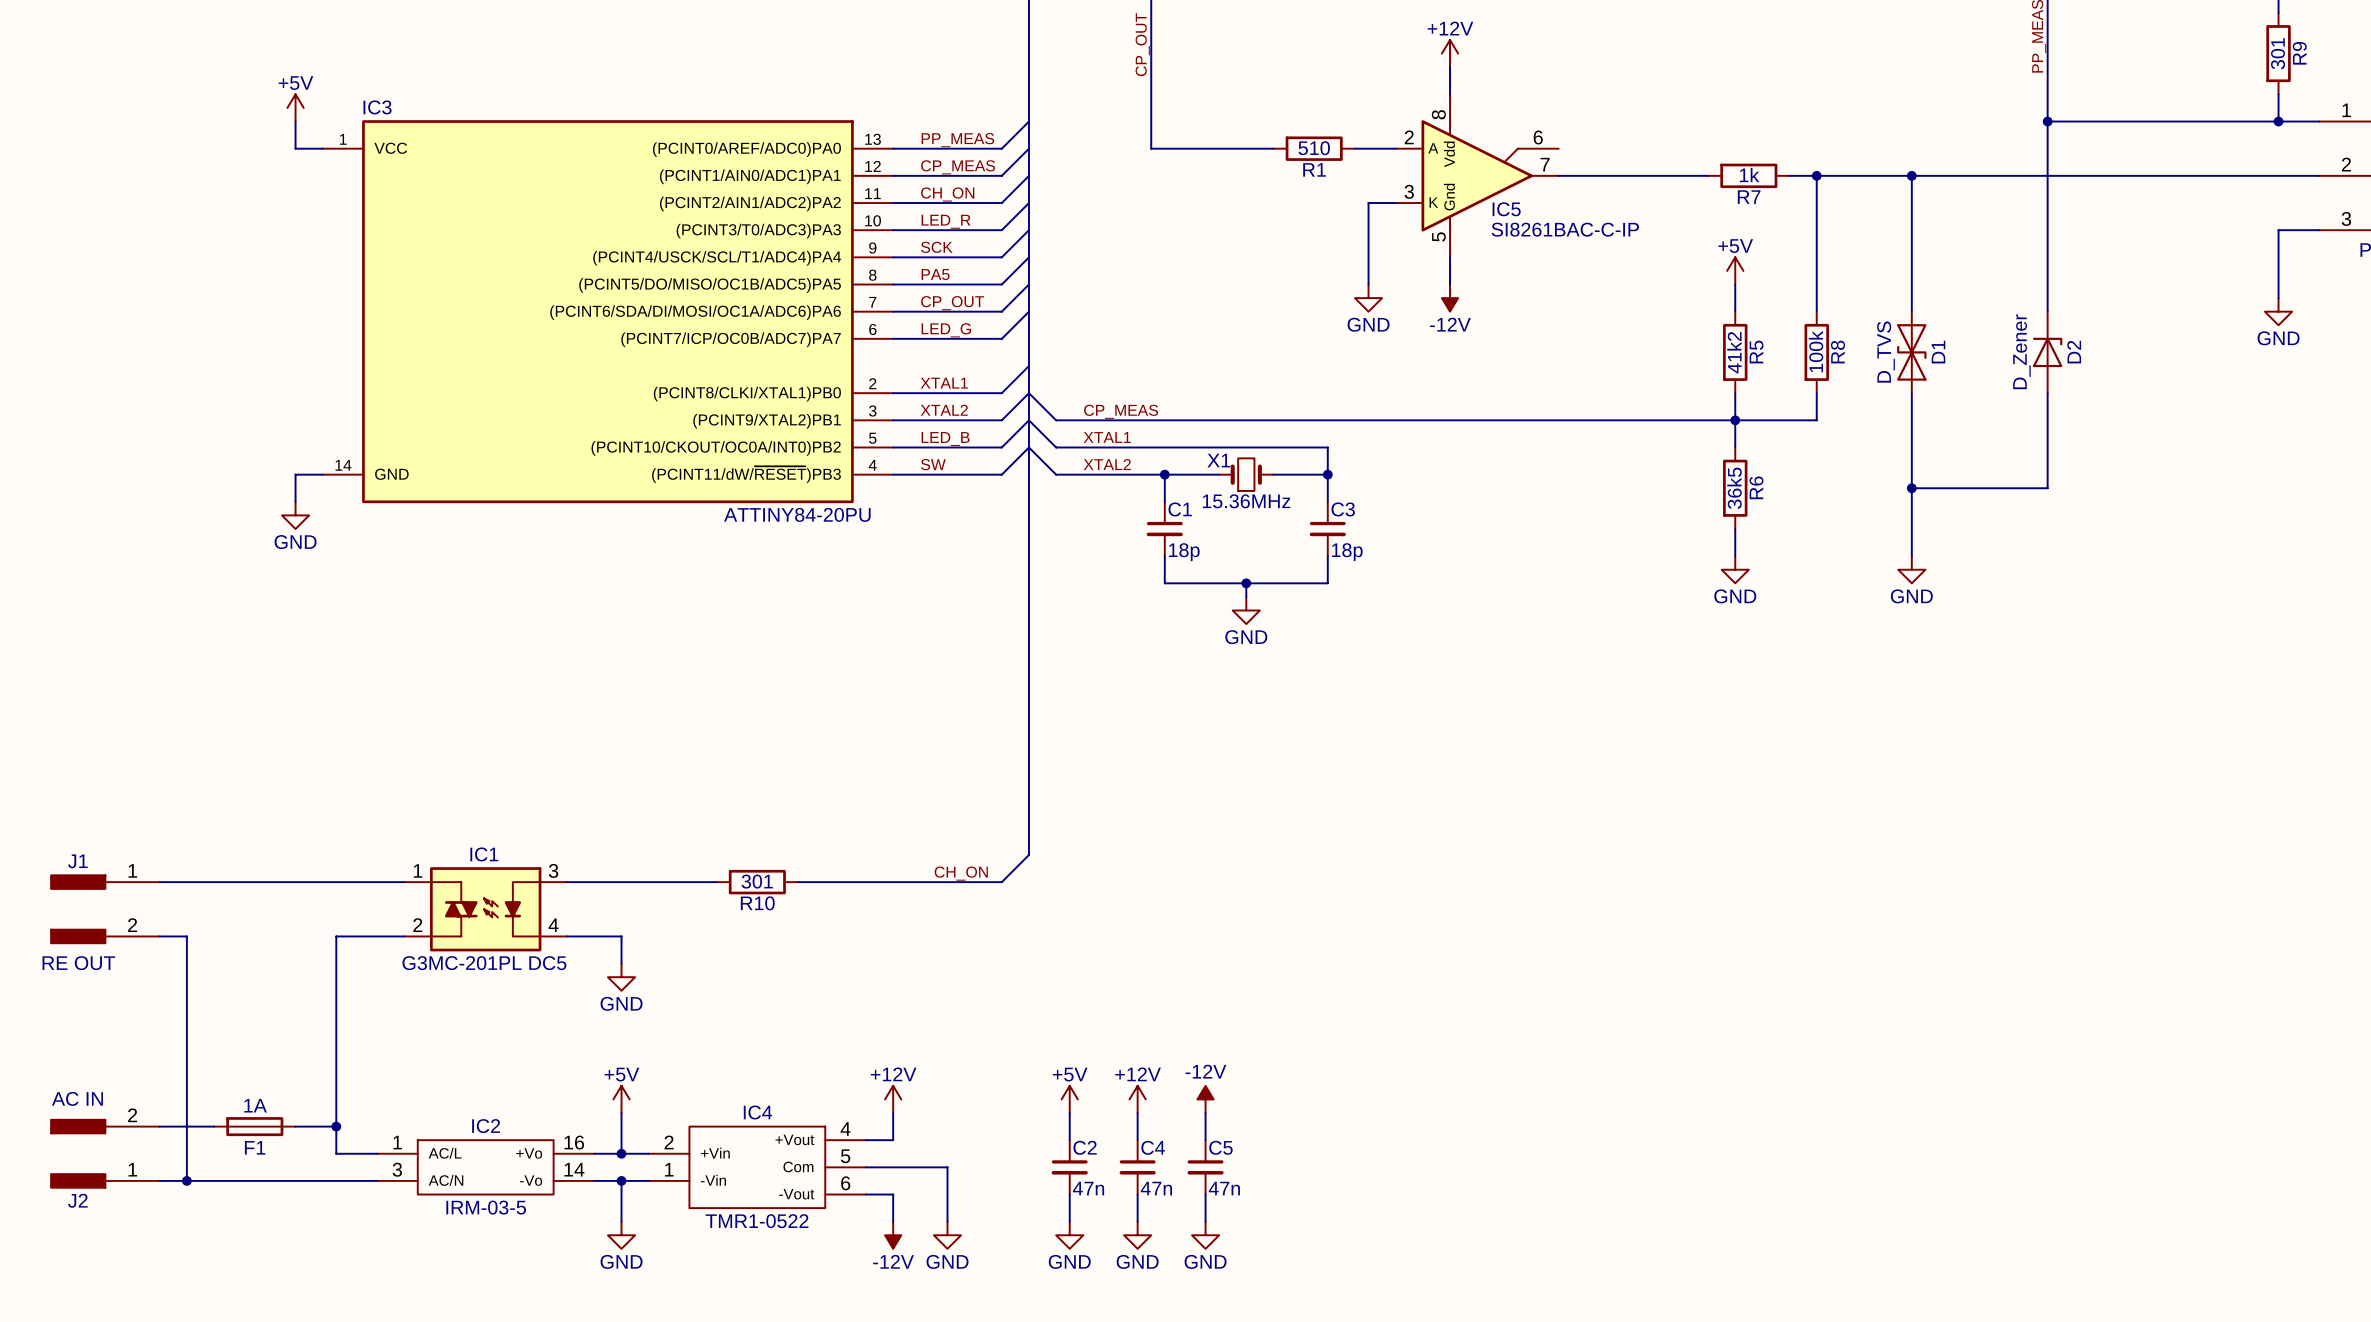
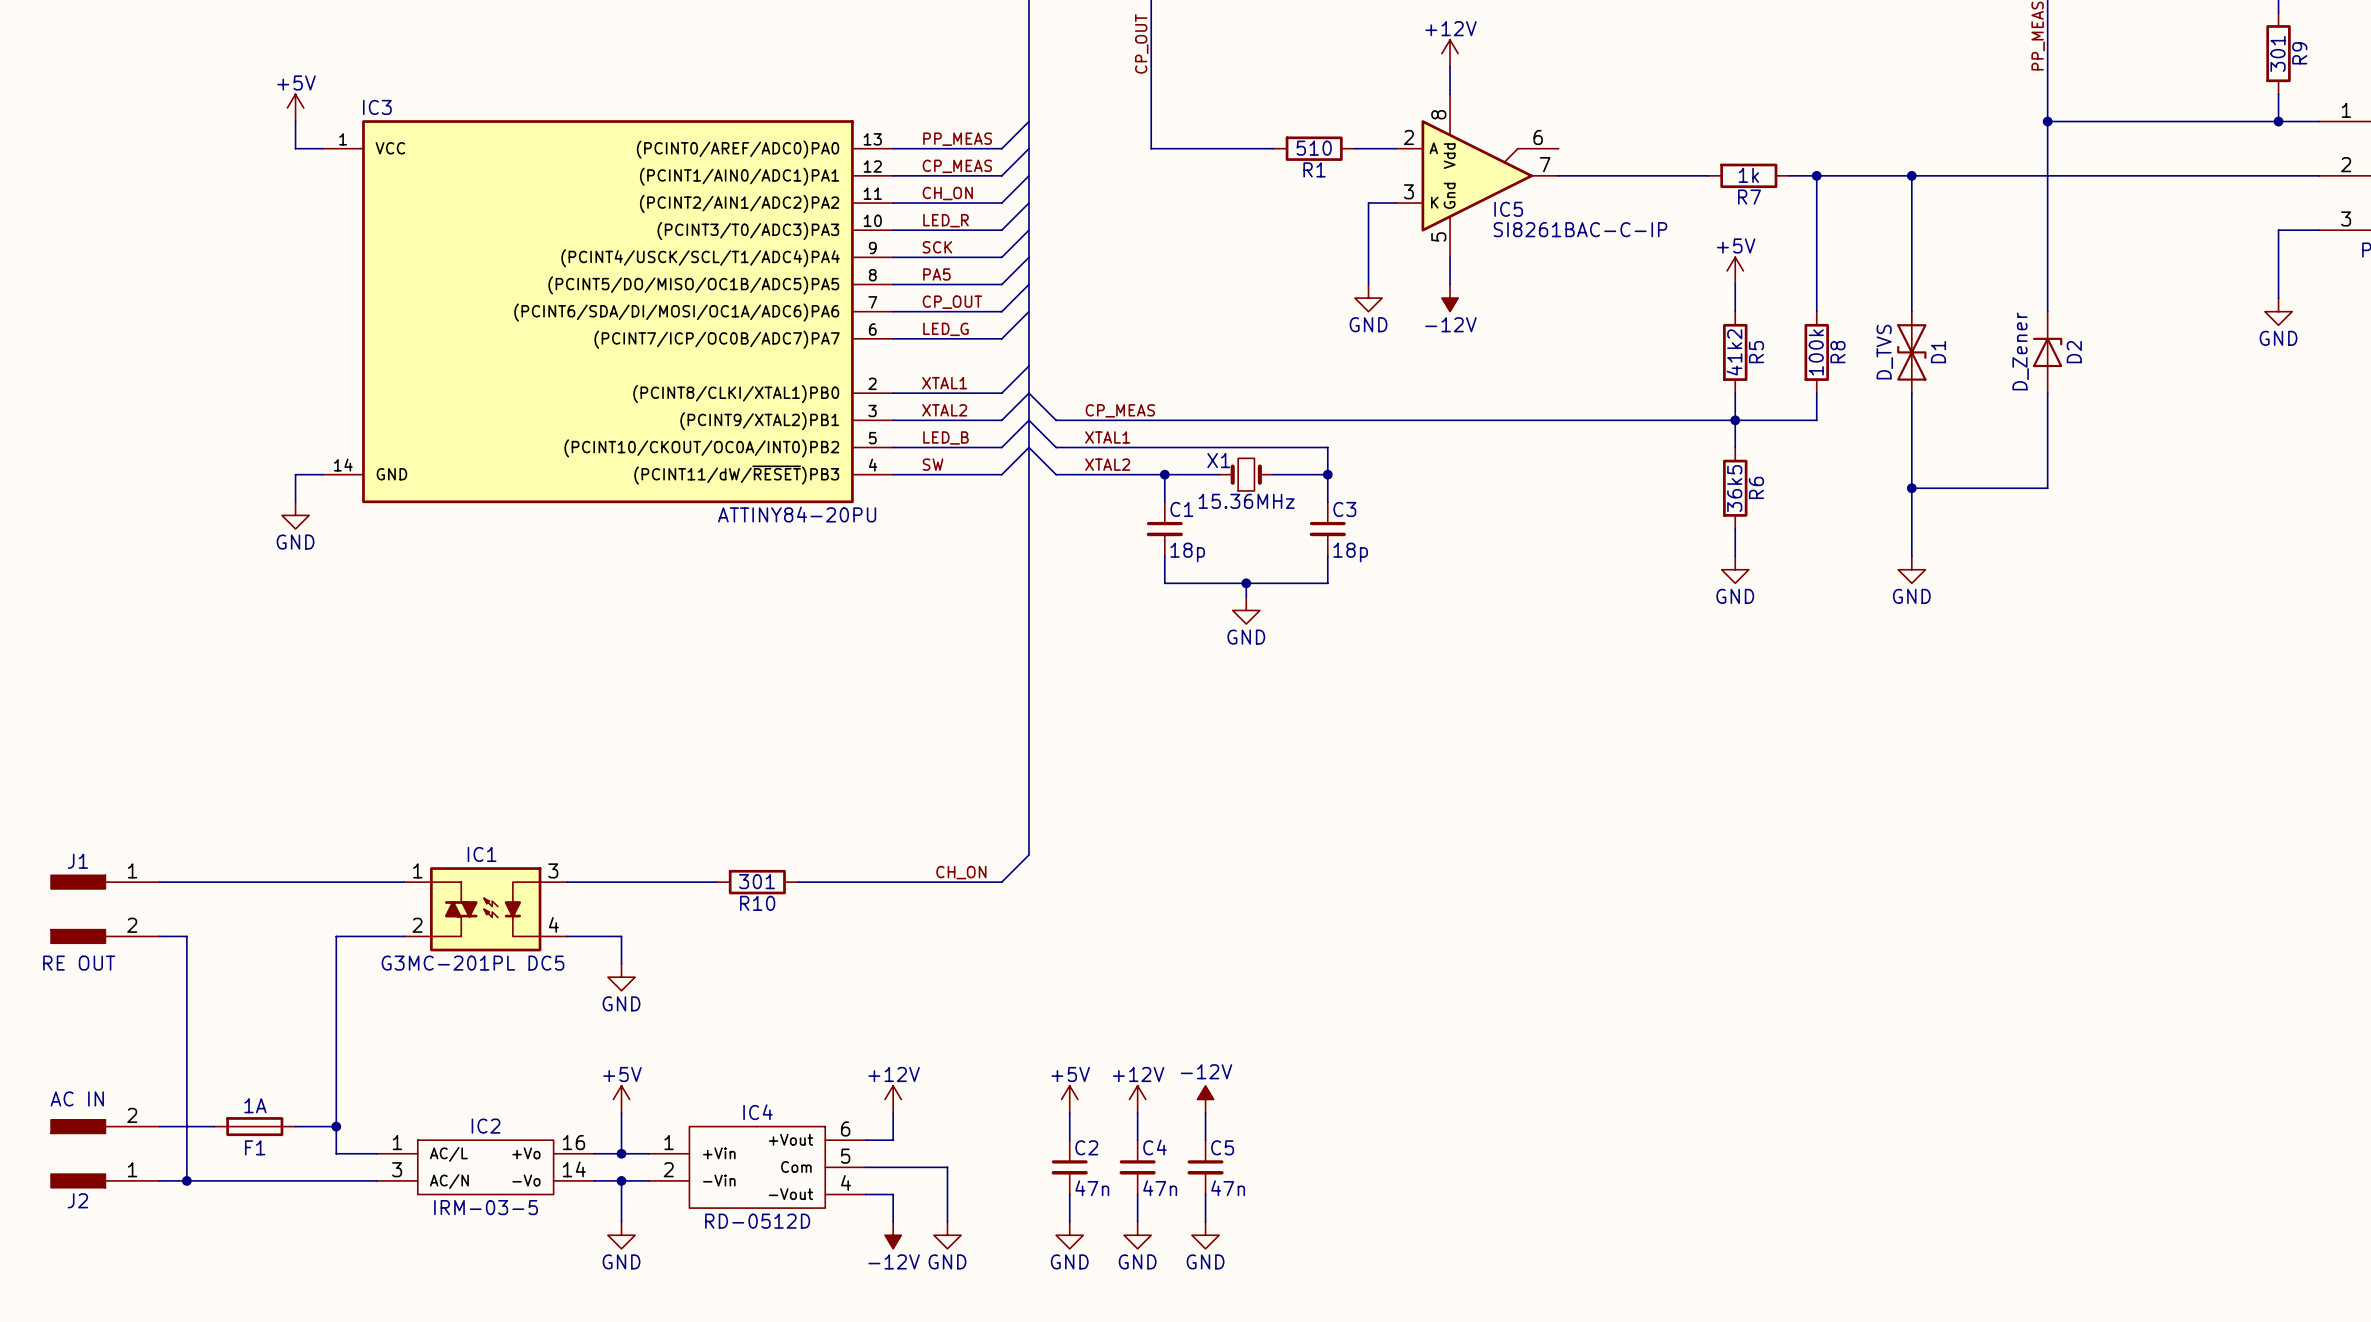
IC4 pin number: 4 (845, 1128) -> 6 (845, 1128)
IC4 pin number: 2 (669, 1142) -> 1 (669, 1142)
IC4 pin number: 1 (669, 1169) -> 2 (668, 1169)
IC4 pin number: 6 (845, 1183) -> 4 (845, 1182)
IC4 value: TMR1-0522 (757, 1221) -> RD-0512D (757, 1221)

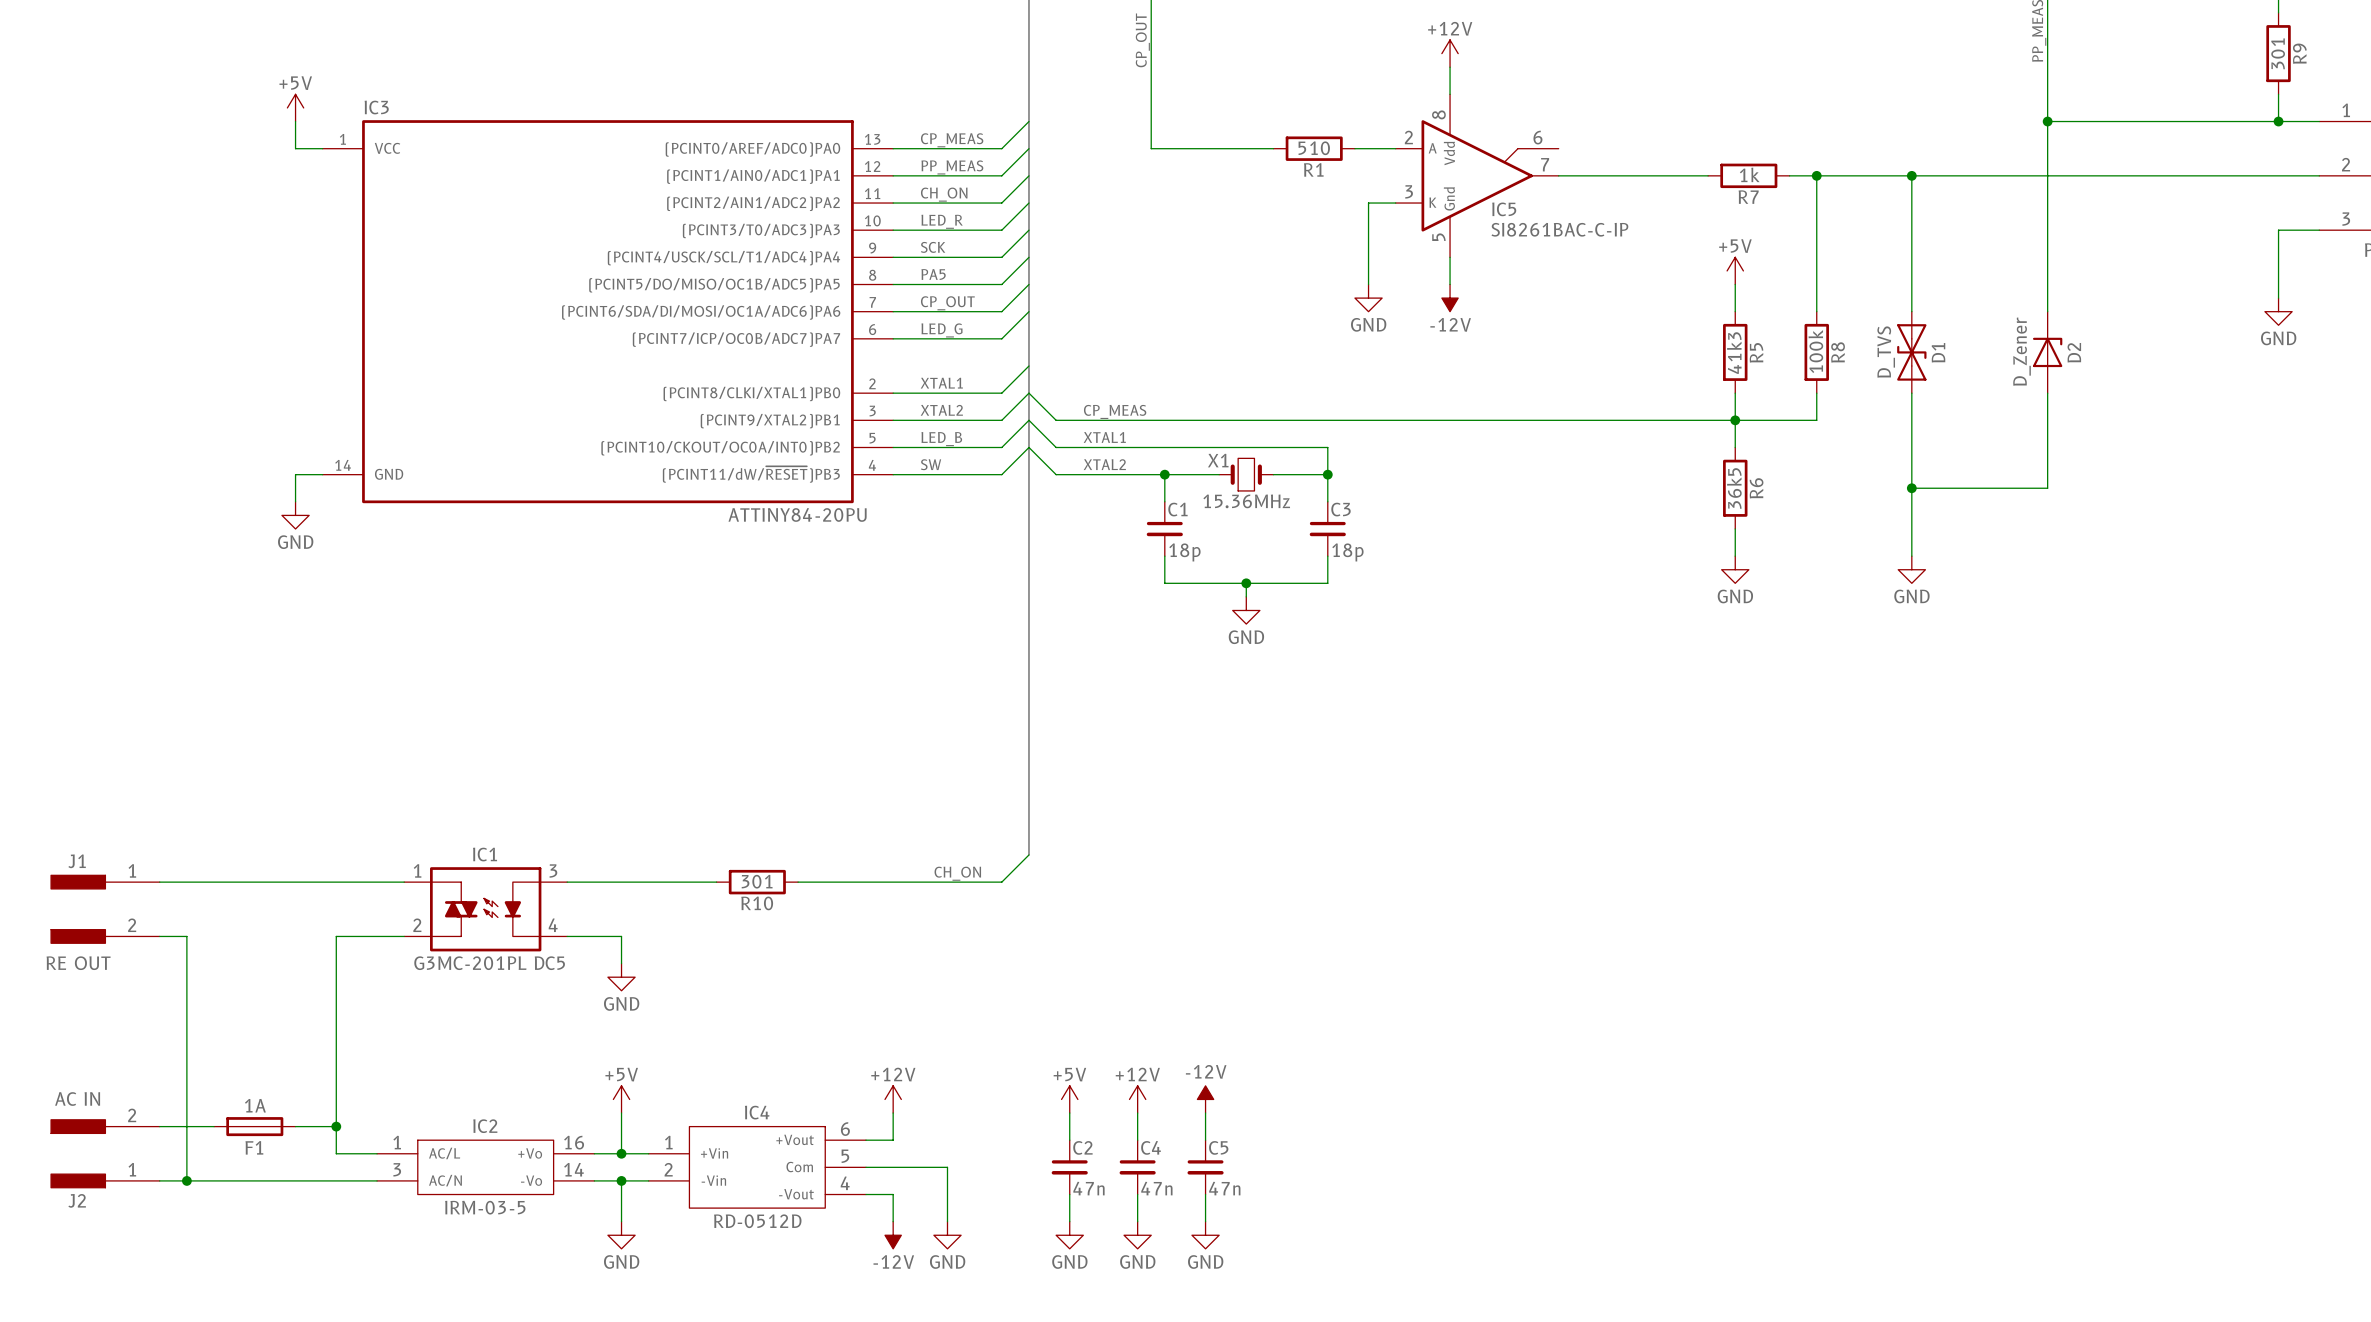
label: PP_MEAS (957, 139) -> CP_MEAS (952, 140)
label: CP_MEAS (957, 166) -> PP_MEAS (952, 167)
R5 value: 41k2 (1734, 352) -> 41k3 (1734, 353)

